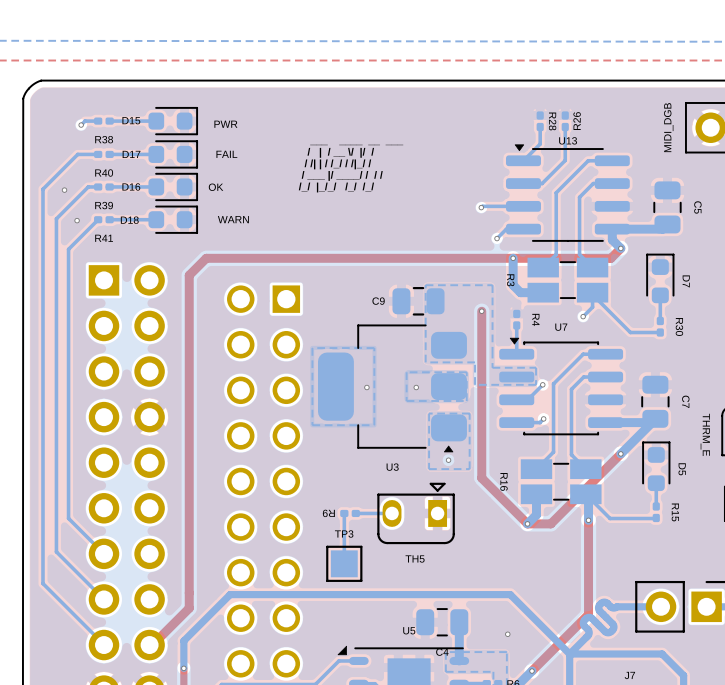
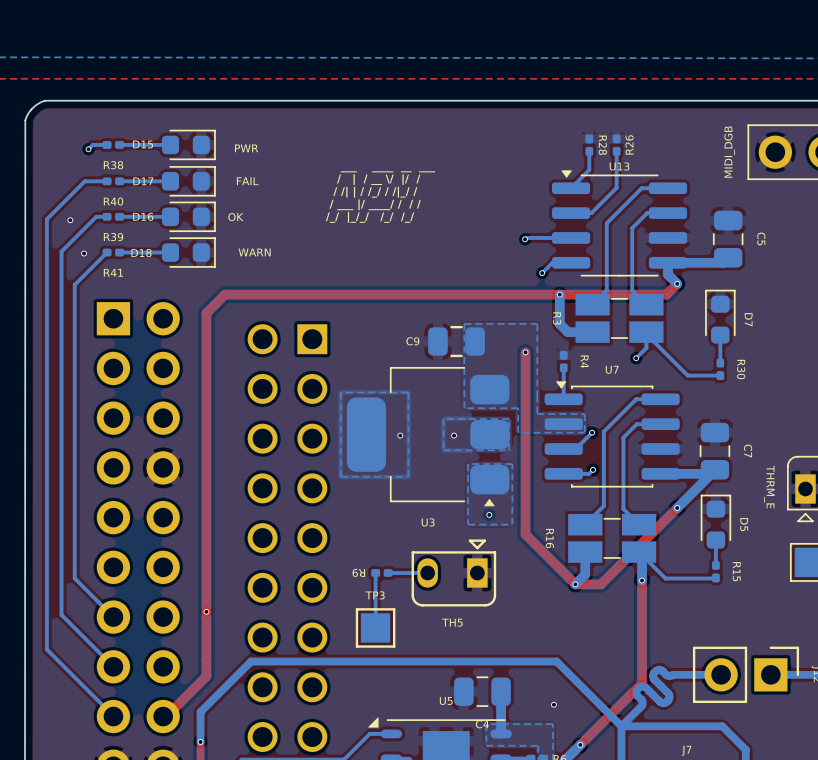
via: none -> (206, 611)

